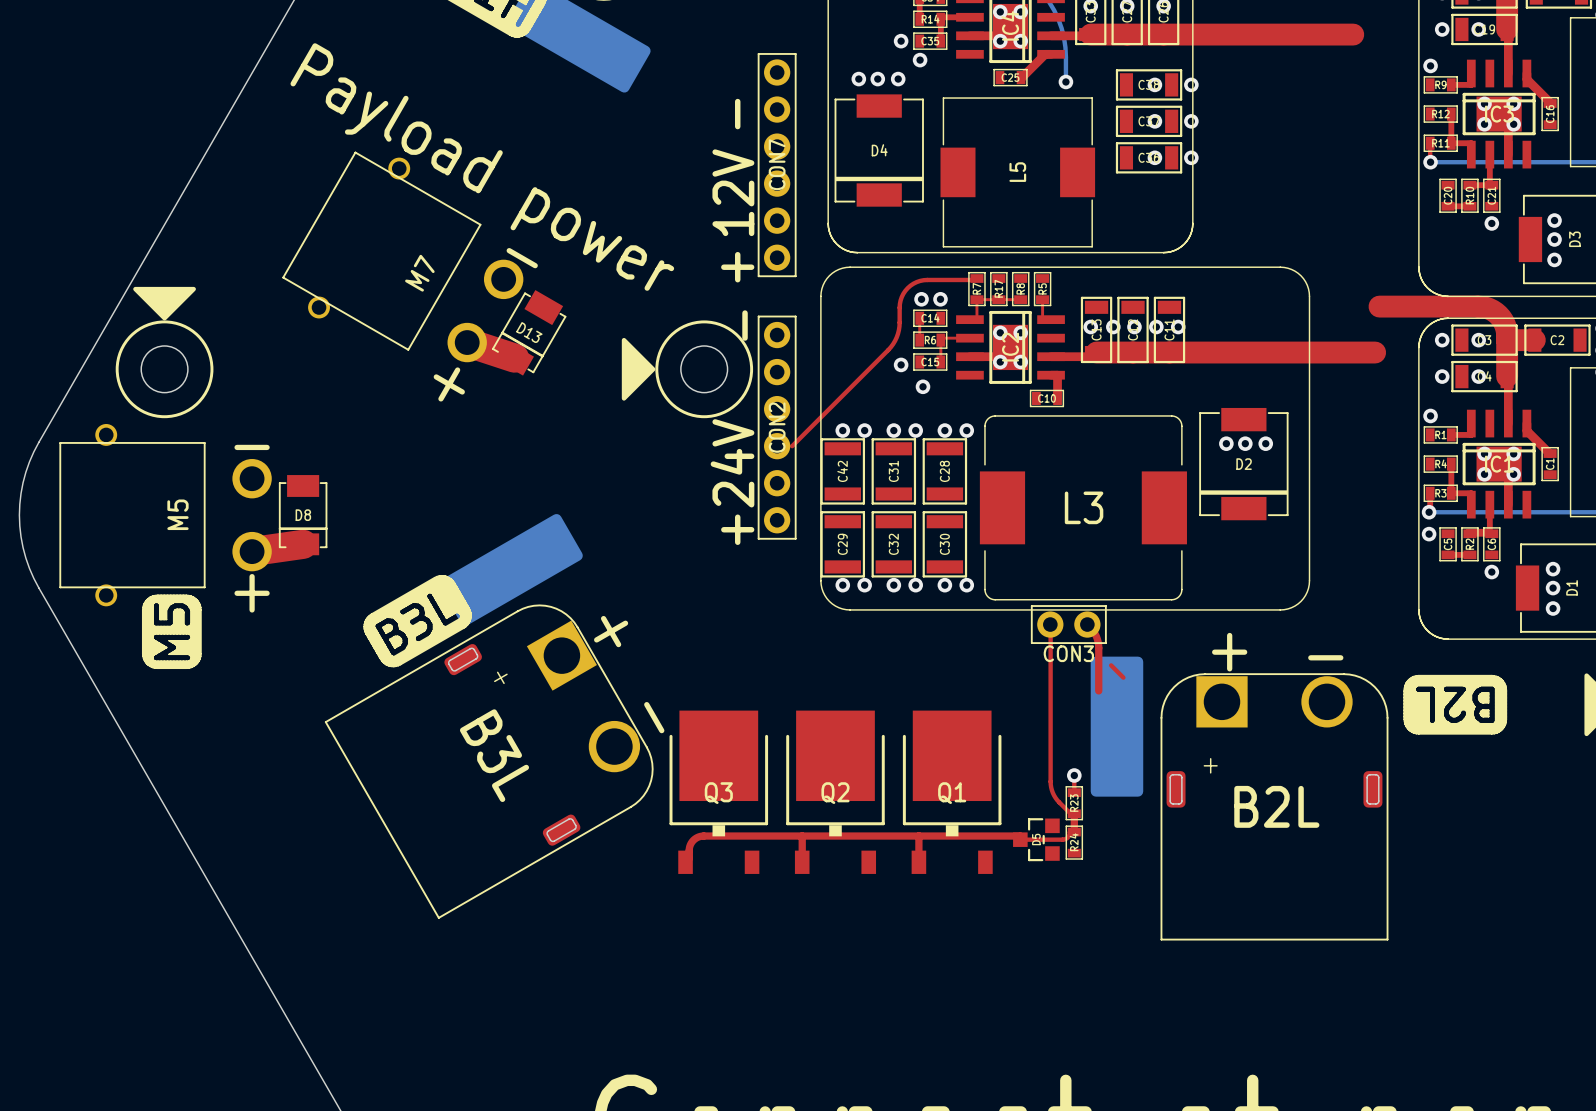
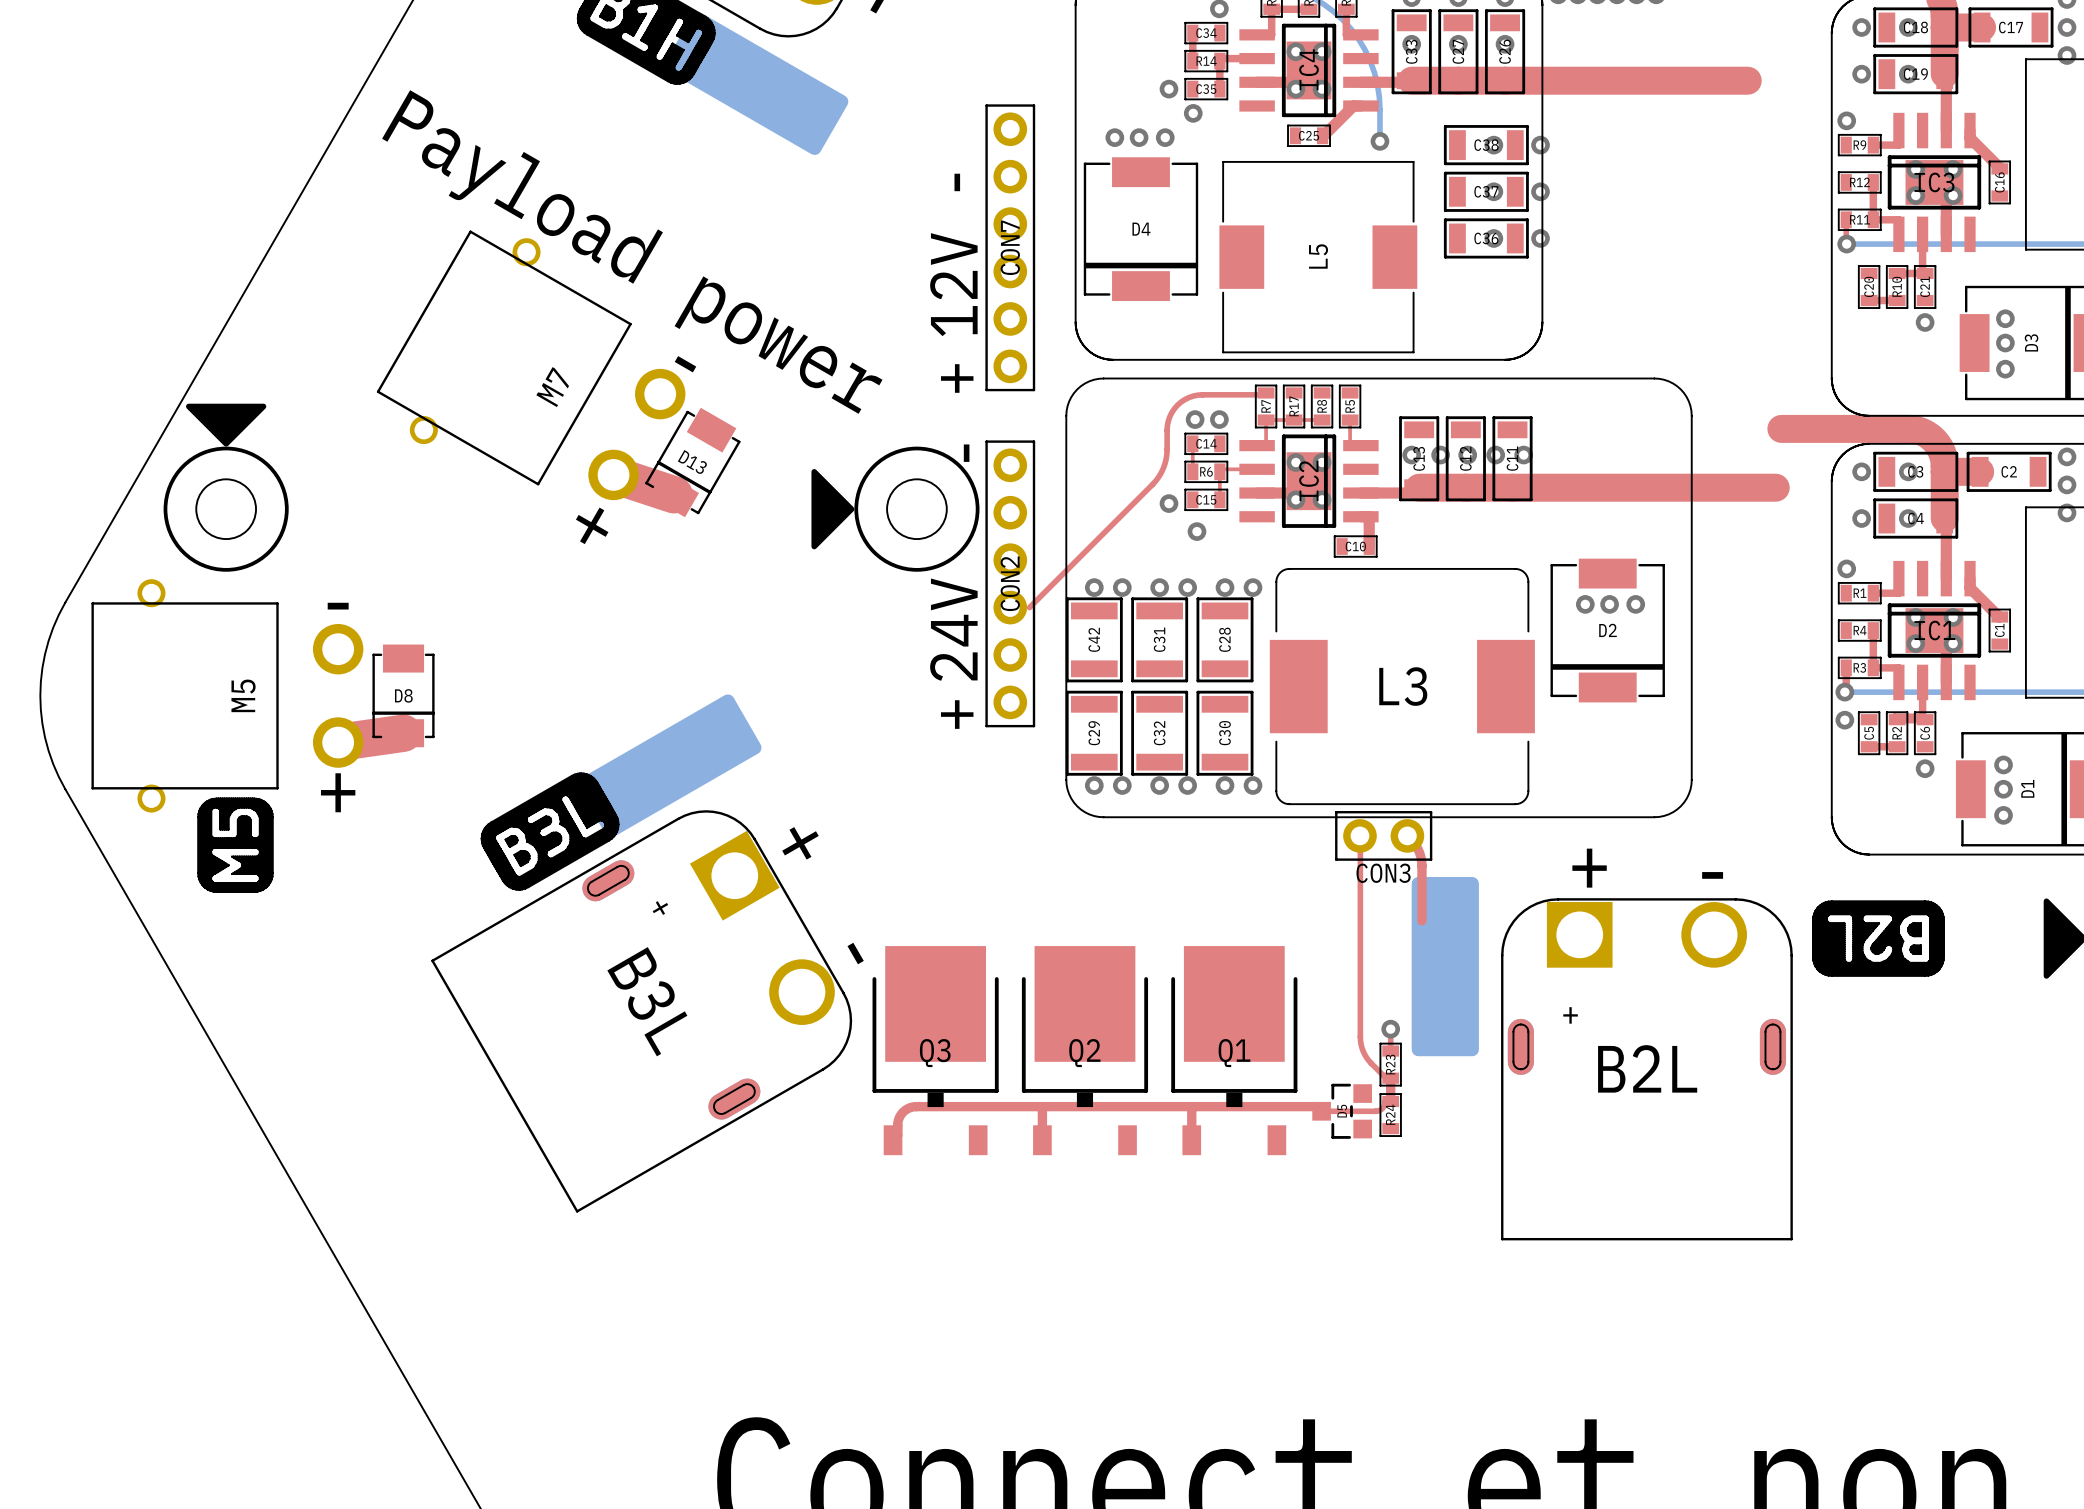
B3L footprint: [324, 604, 654, 919] -> [431, 810, 853, 1213]
top track: (1111, 665) (1123, 677) -> none
B2L footprint: [1160, 673, 1389, 941] -> [1501, 898, 1793, 1241]

